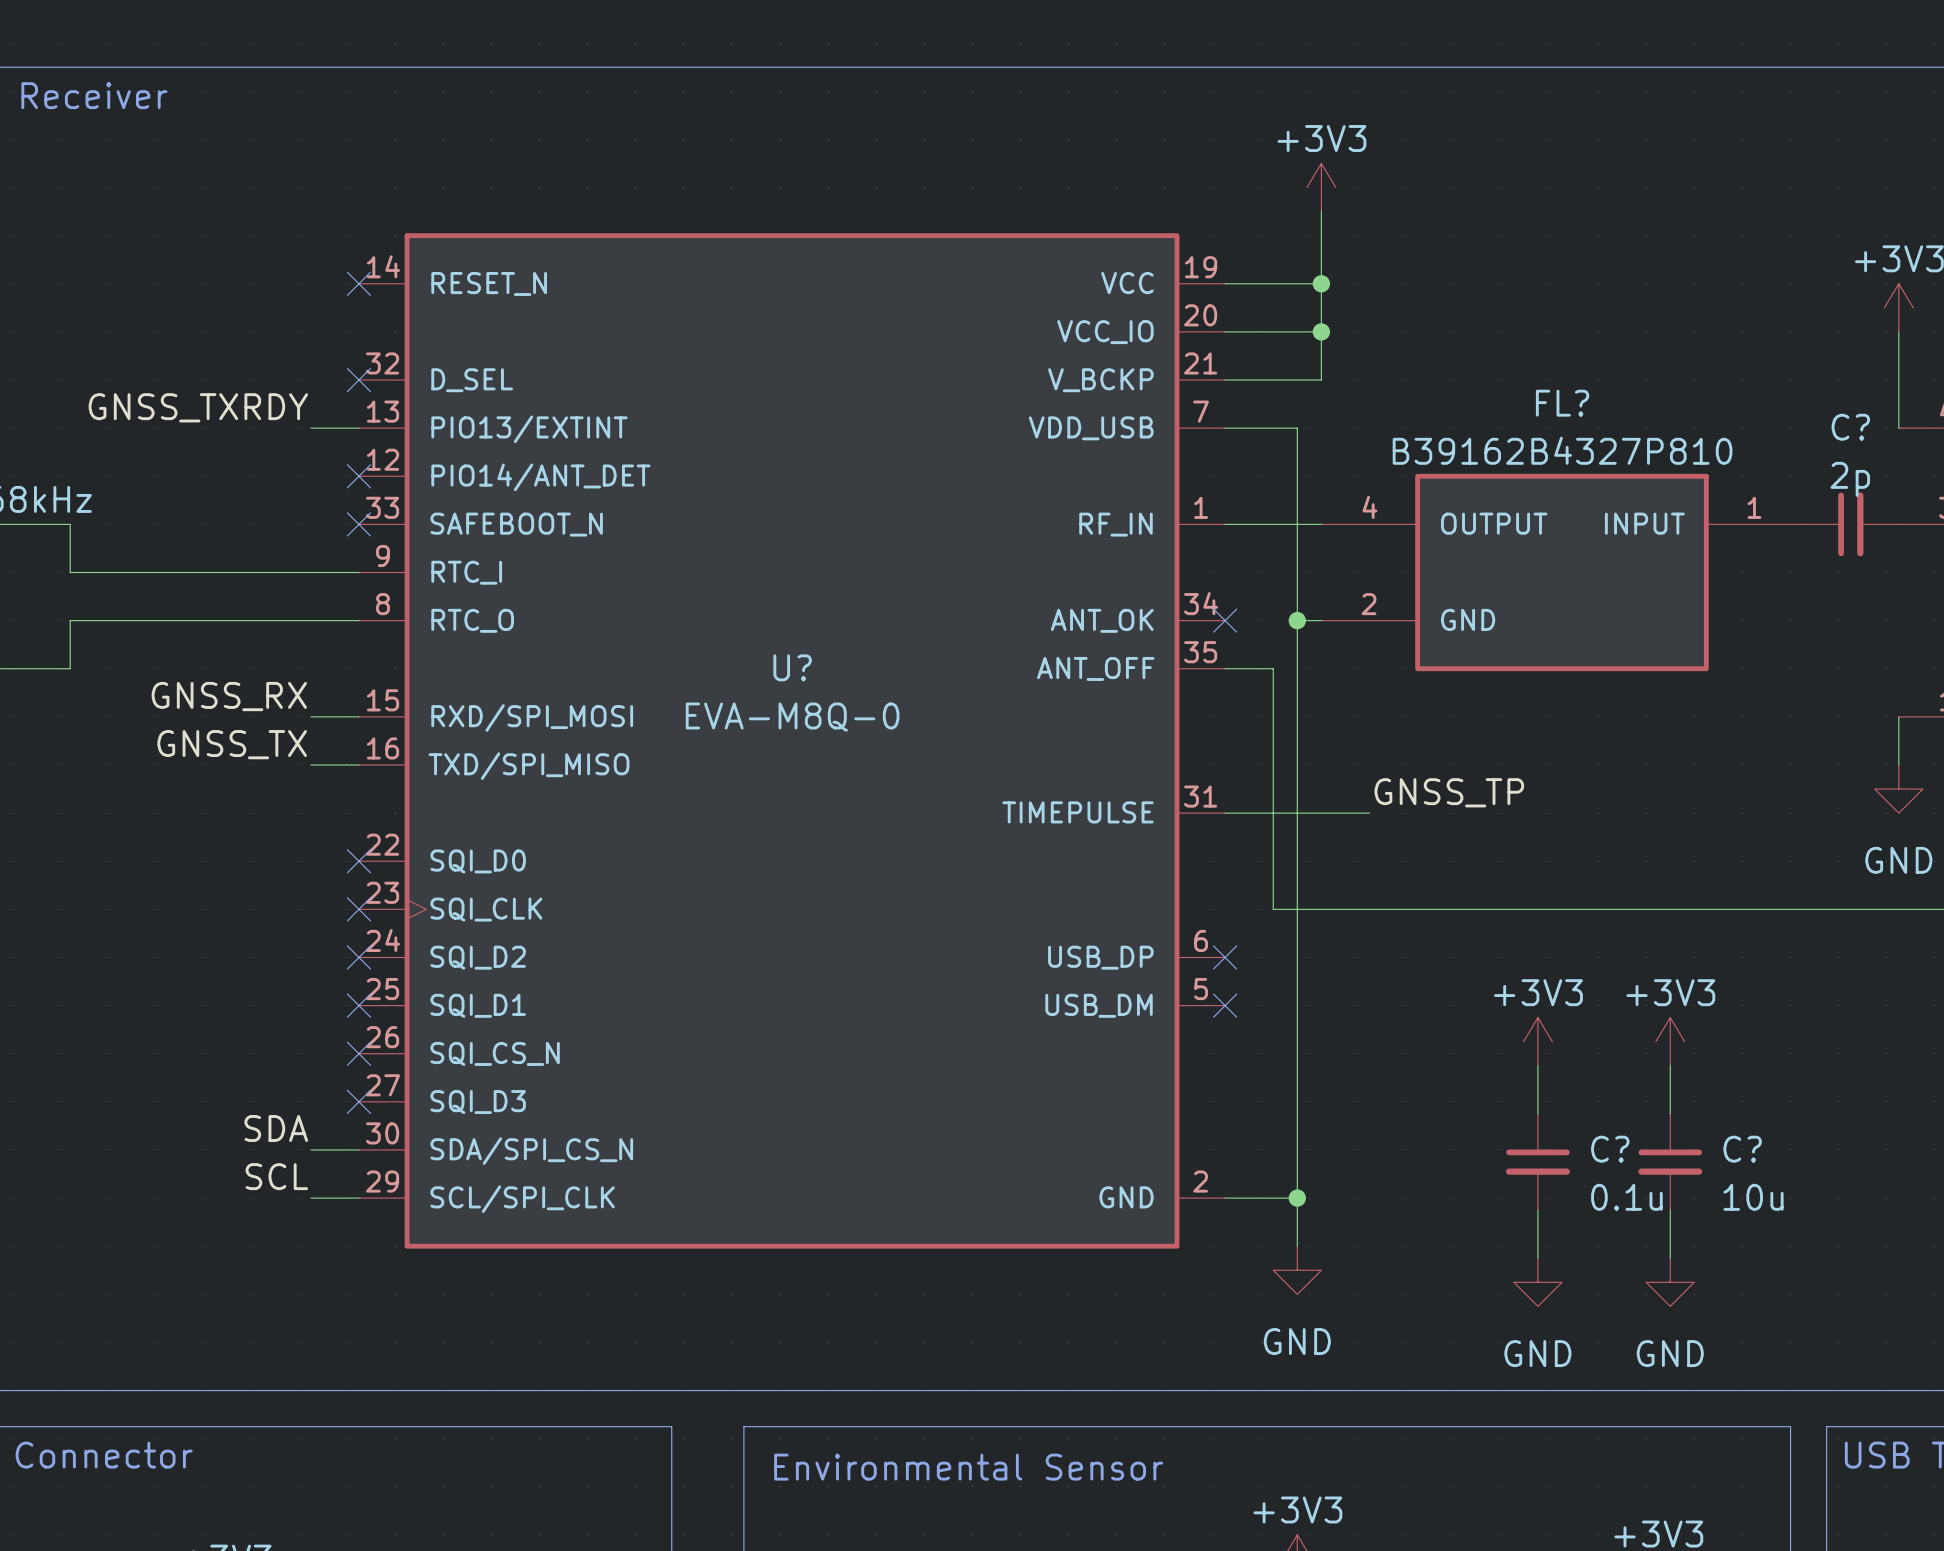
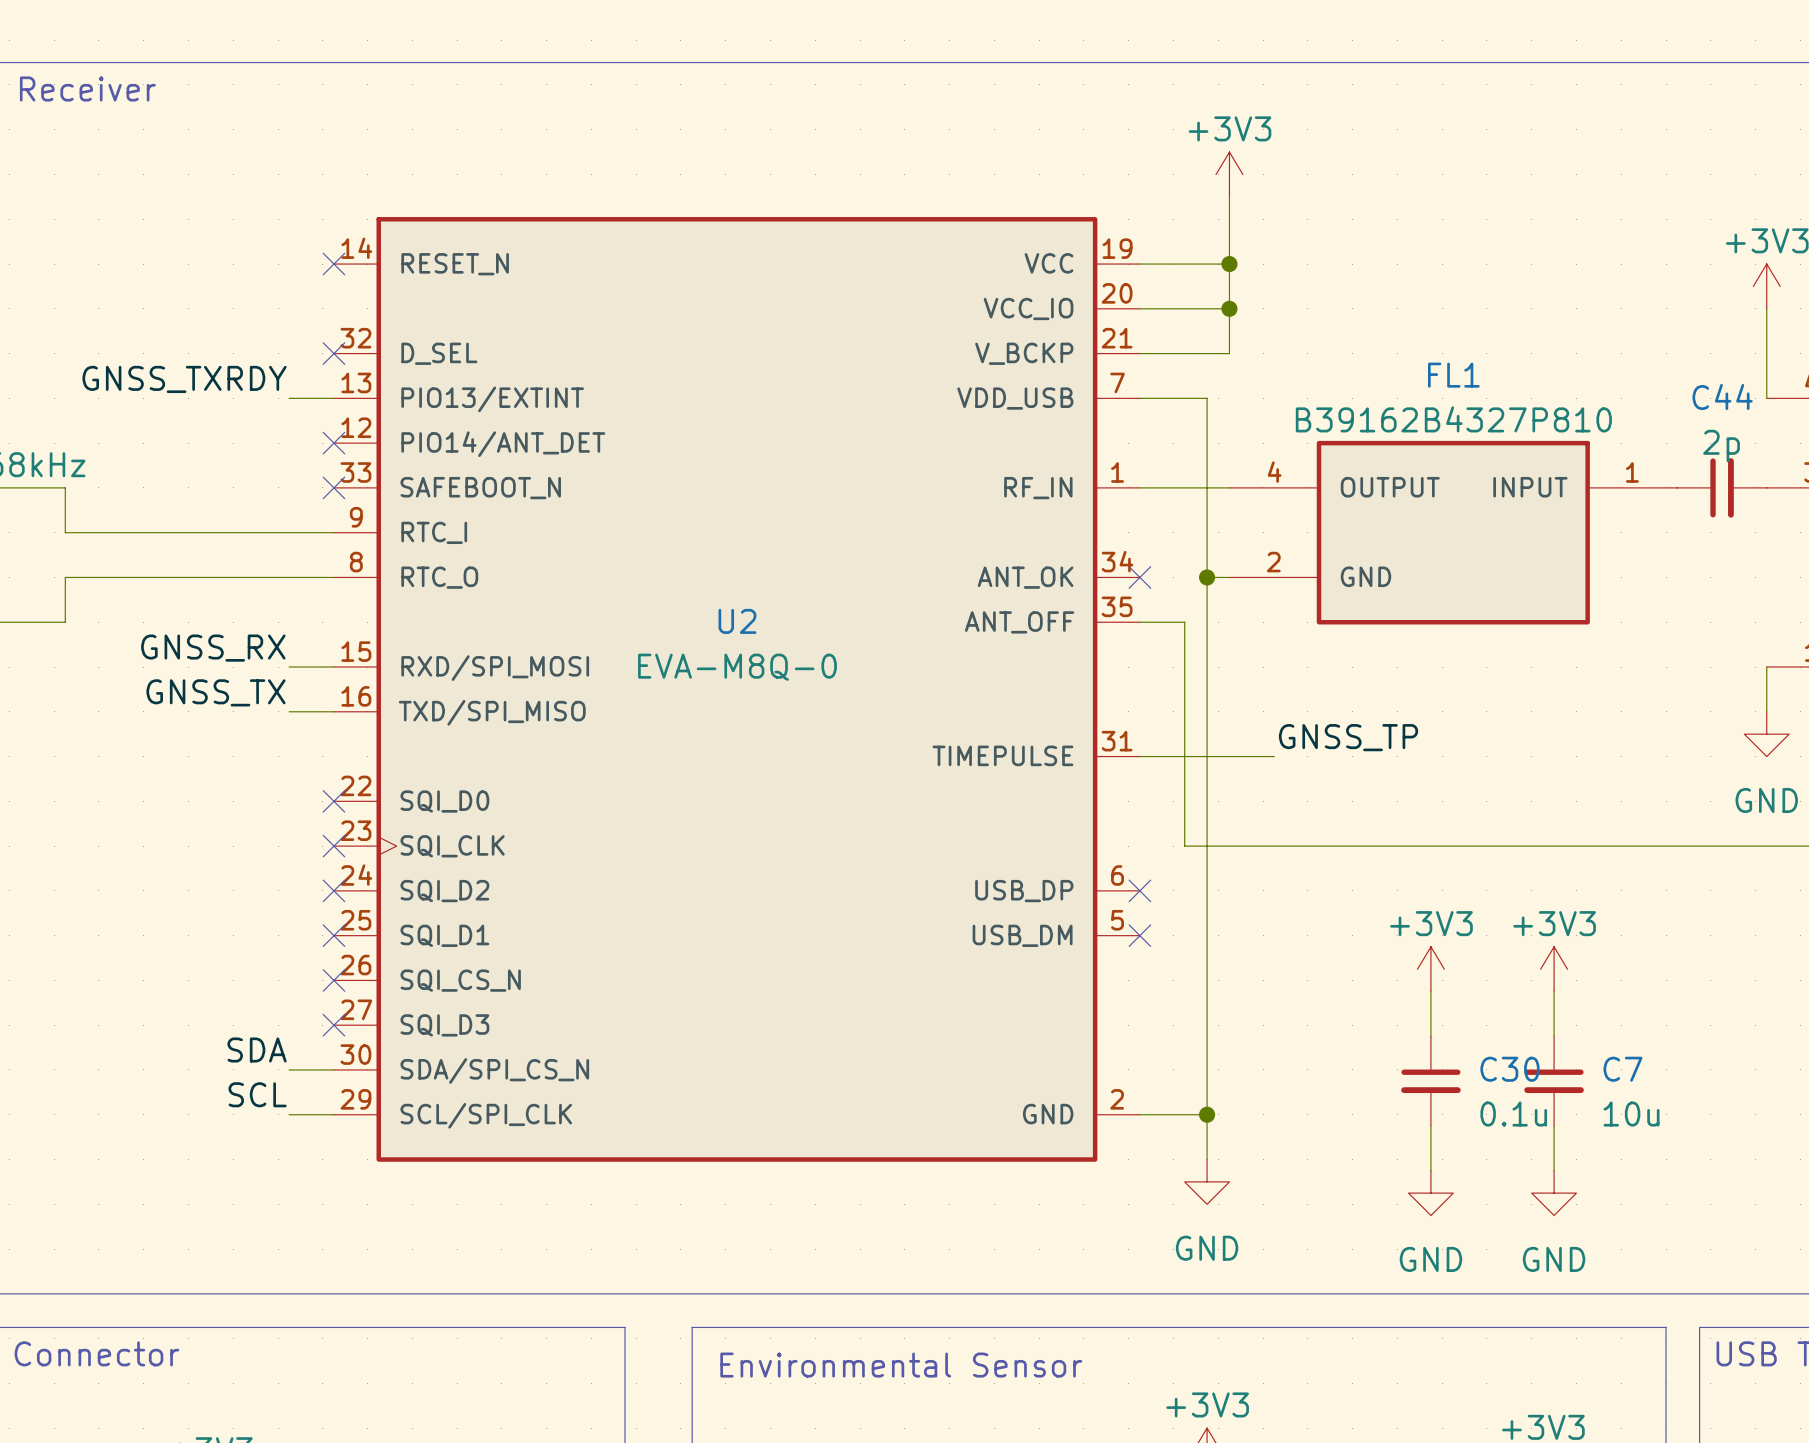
FL? name: FL? (1562, 403) -> FL1 (1453, 375)
C? name: C? (1850, 427) -> C44 (1722, 396)
U? name: U? (792, 667) -> U2 (737, 621)
C? name: C? (1610, 1149) -> C30 (1509, 1069)
C? name: C? (1742, 1149) -> C7 (1623, 1069)

